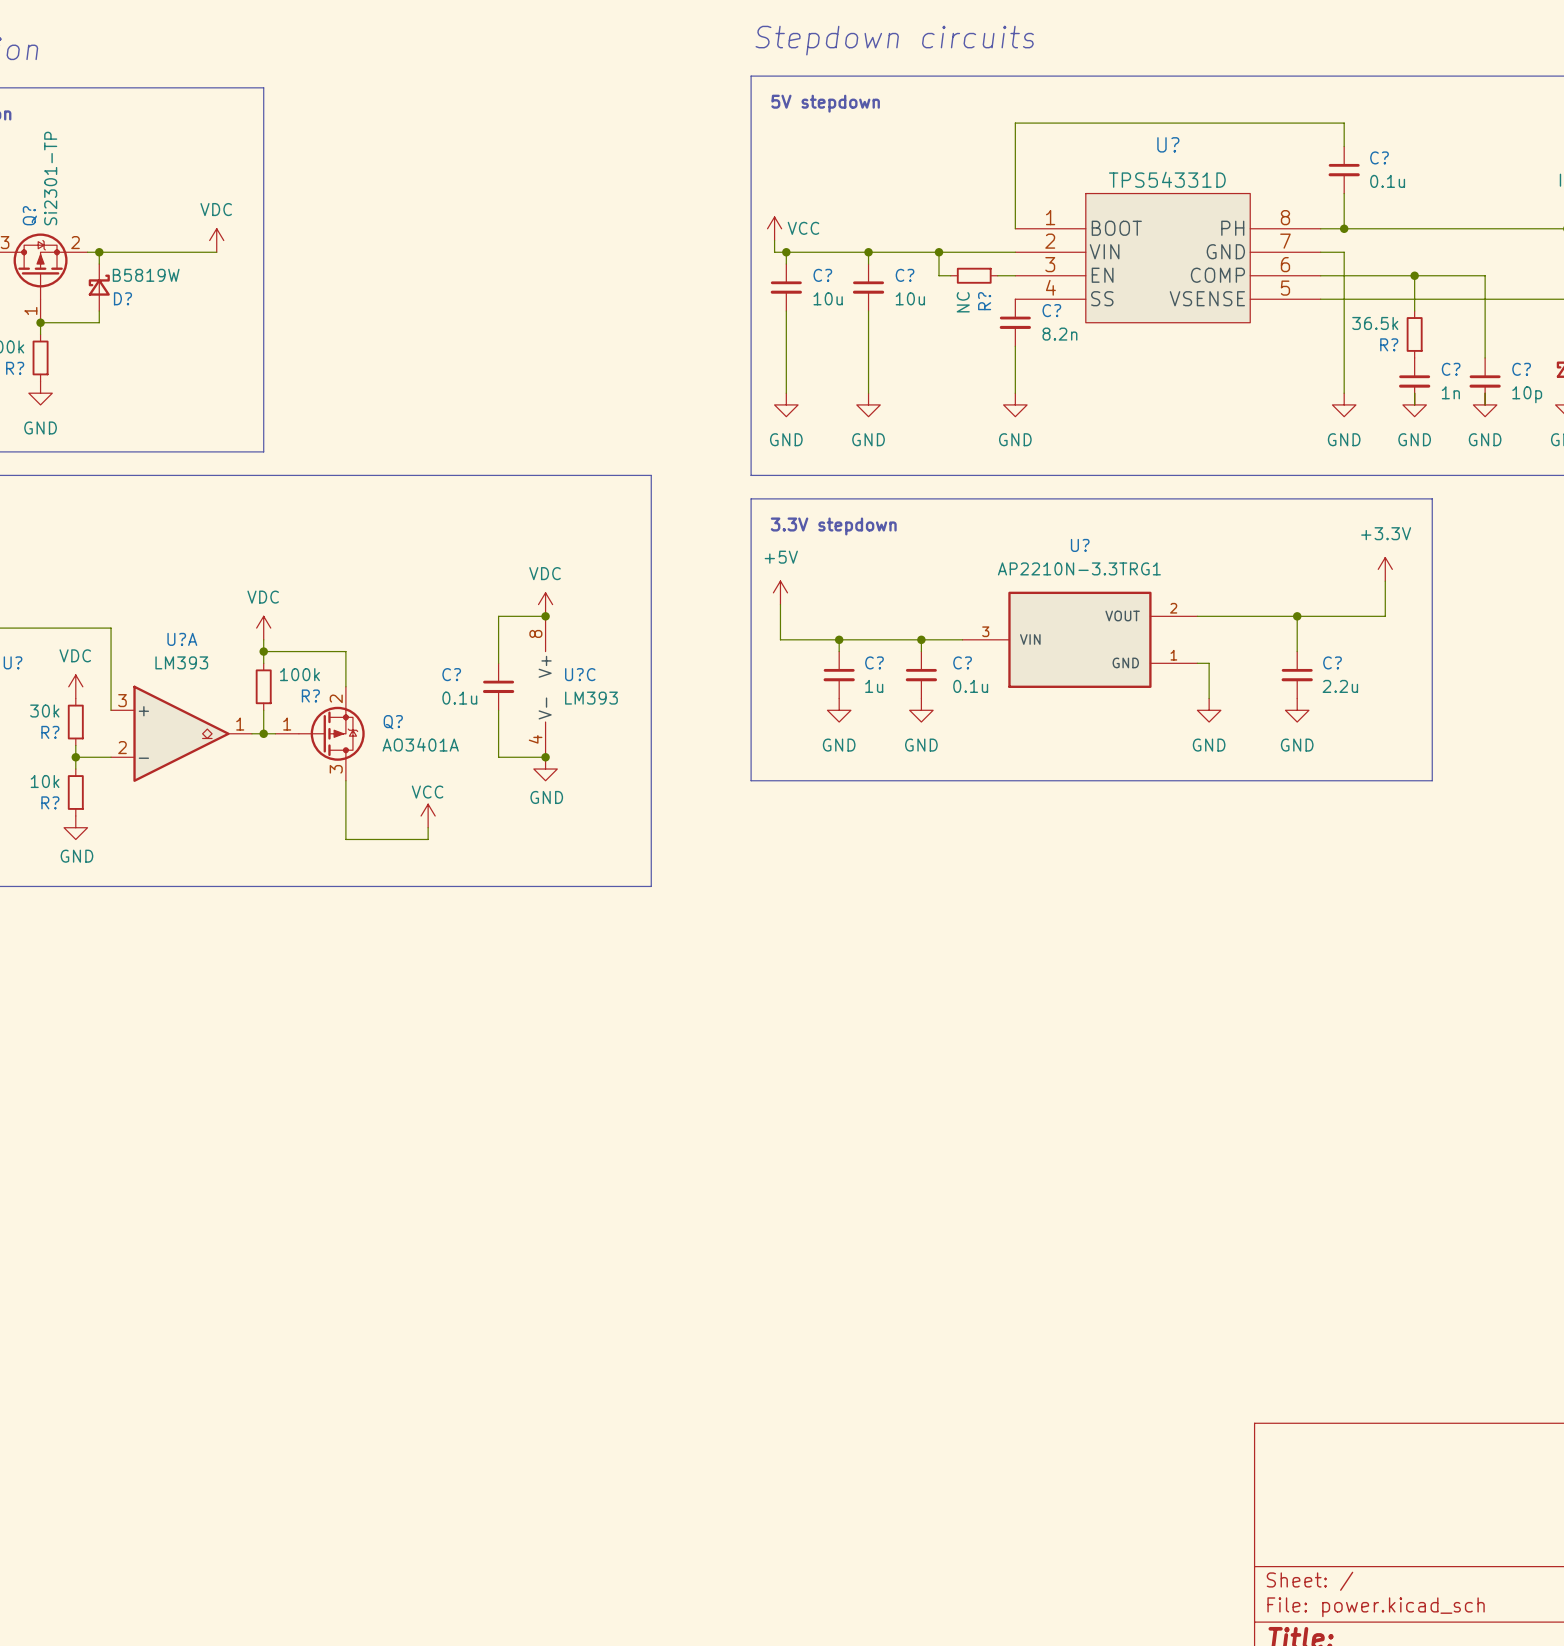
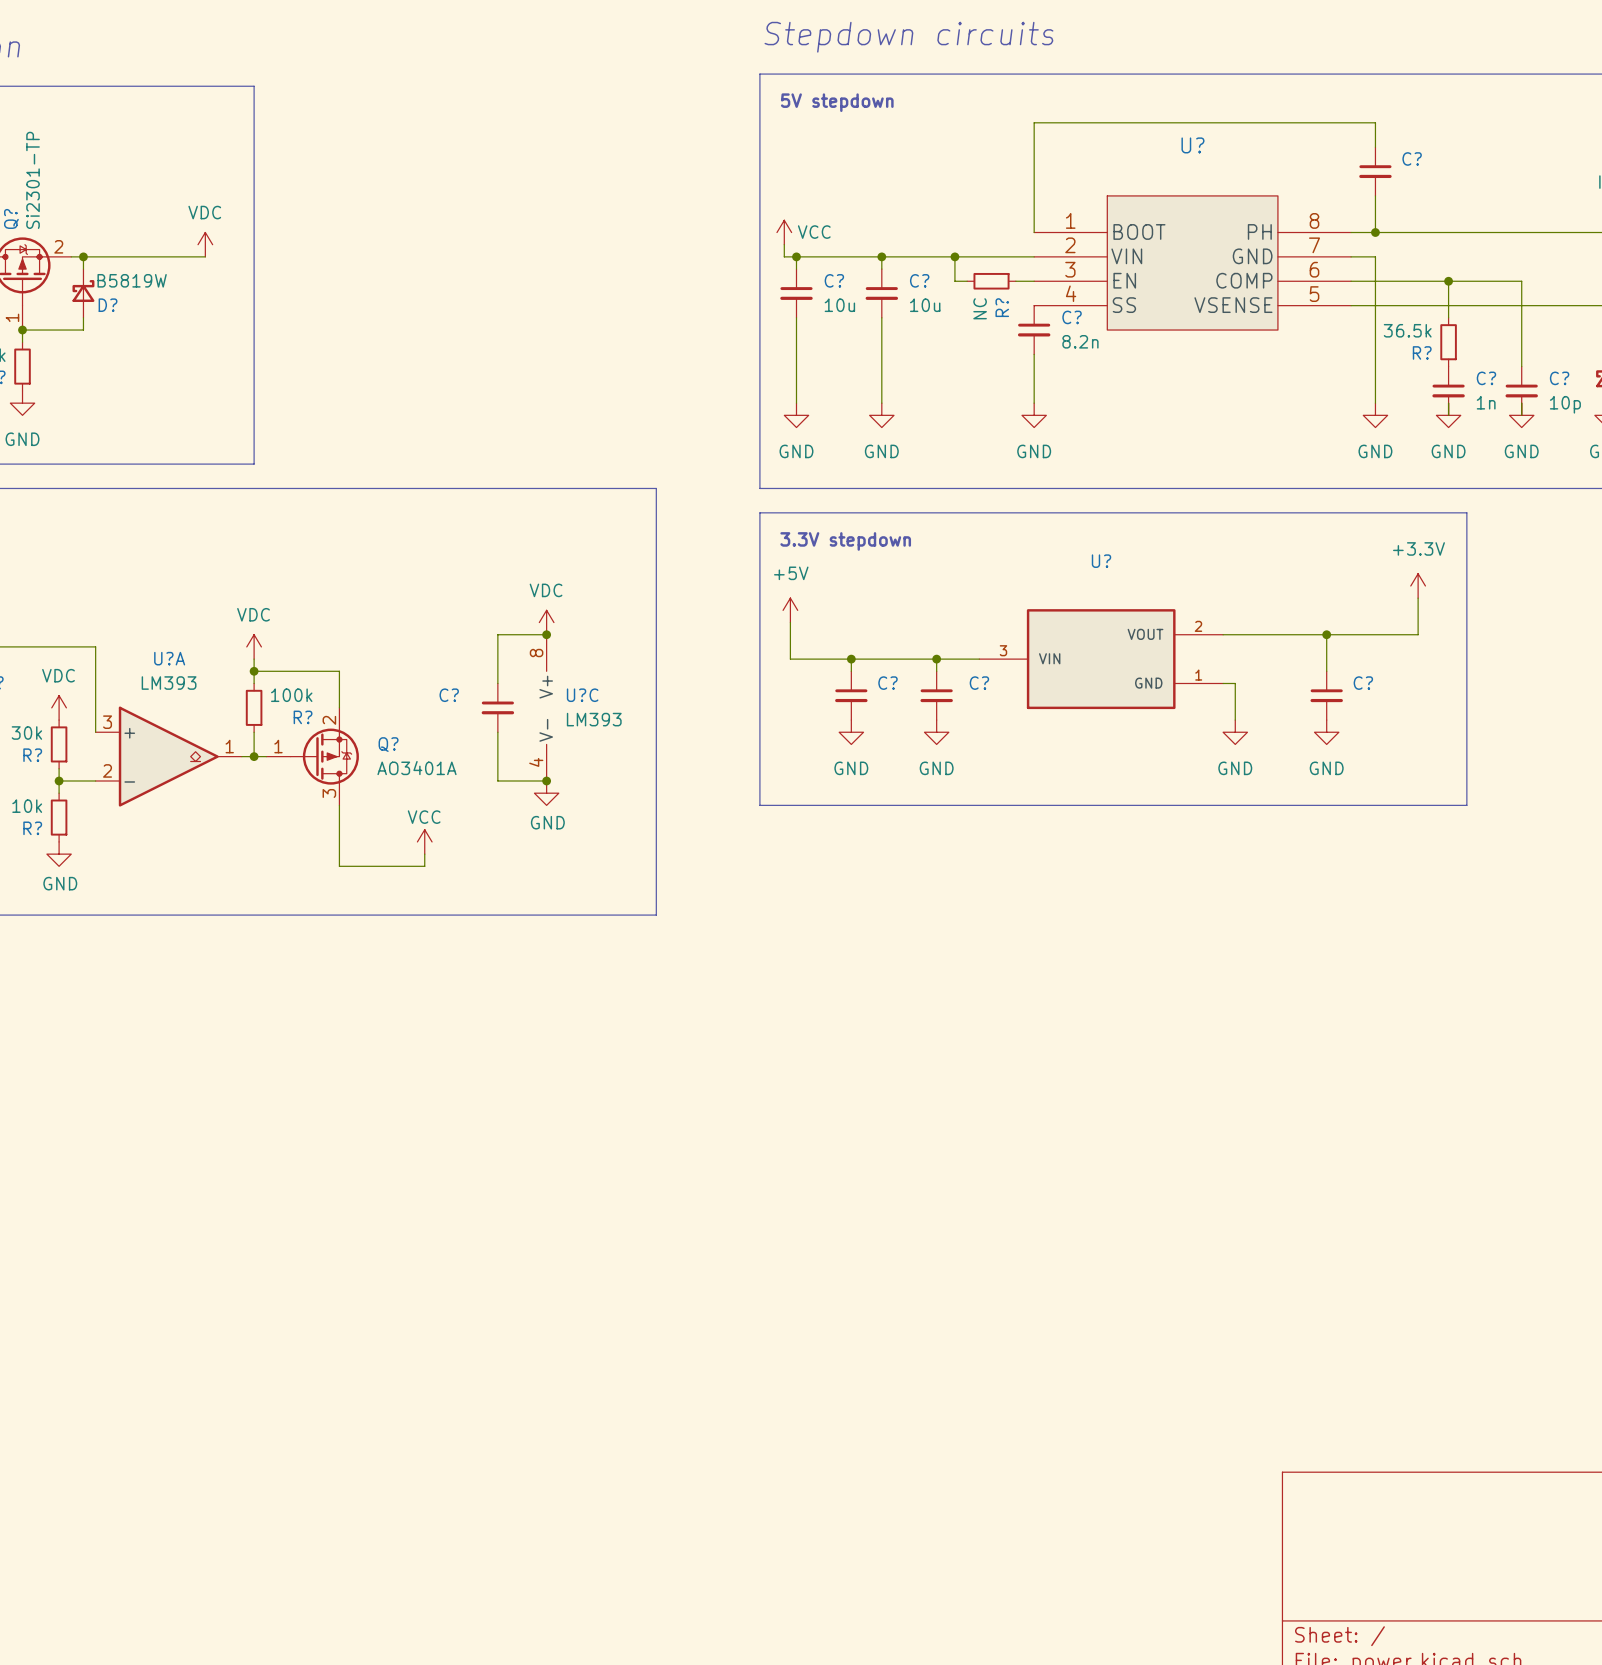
U? value: TPS54331D (1167, 179) -> none
C? value: 0.1u (1387, 181) -> none
U? value: AP2210N-3.3TRG1 (1079, 568) -> none
C? value: 1u (874, 686) -> none
C? value: 0.1u (970, 686) -> none
C? value: 2.2u (1340, 686) -> none
C? value: 0.1u (459, 698) -> none

